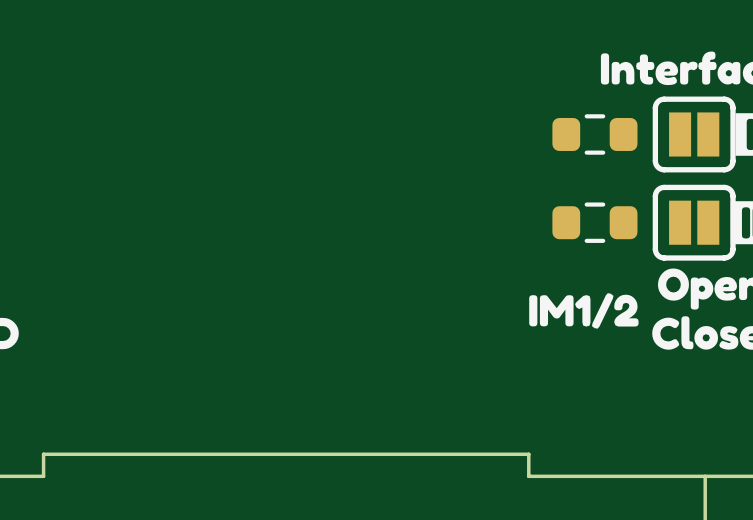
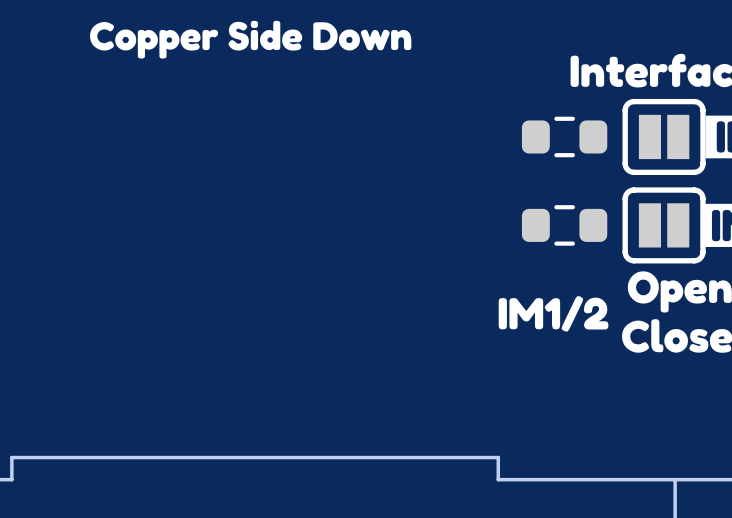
drawing: none -> [89, 20, 412, 59]

